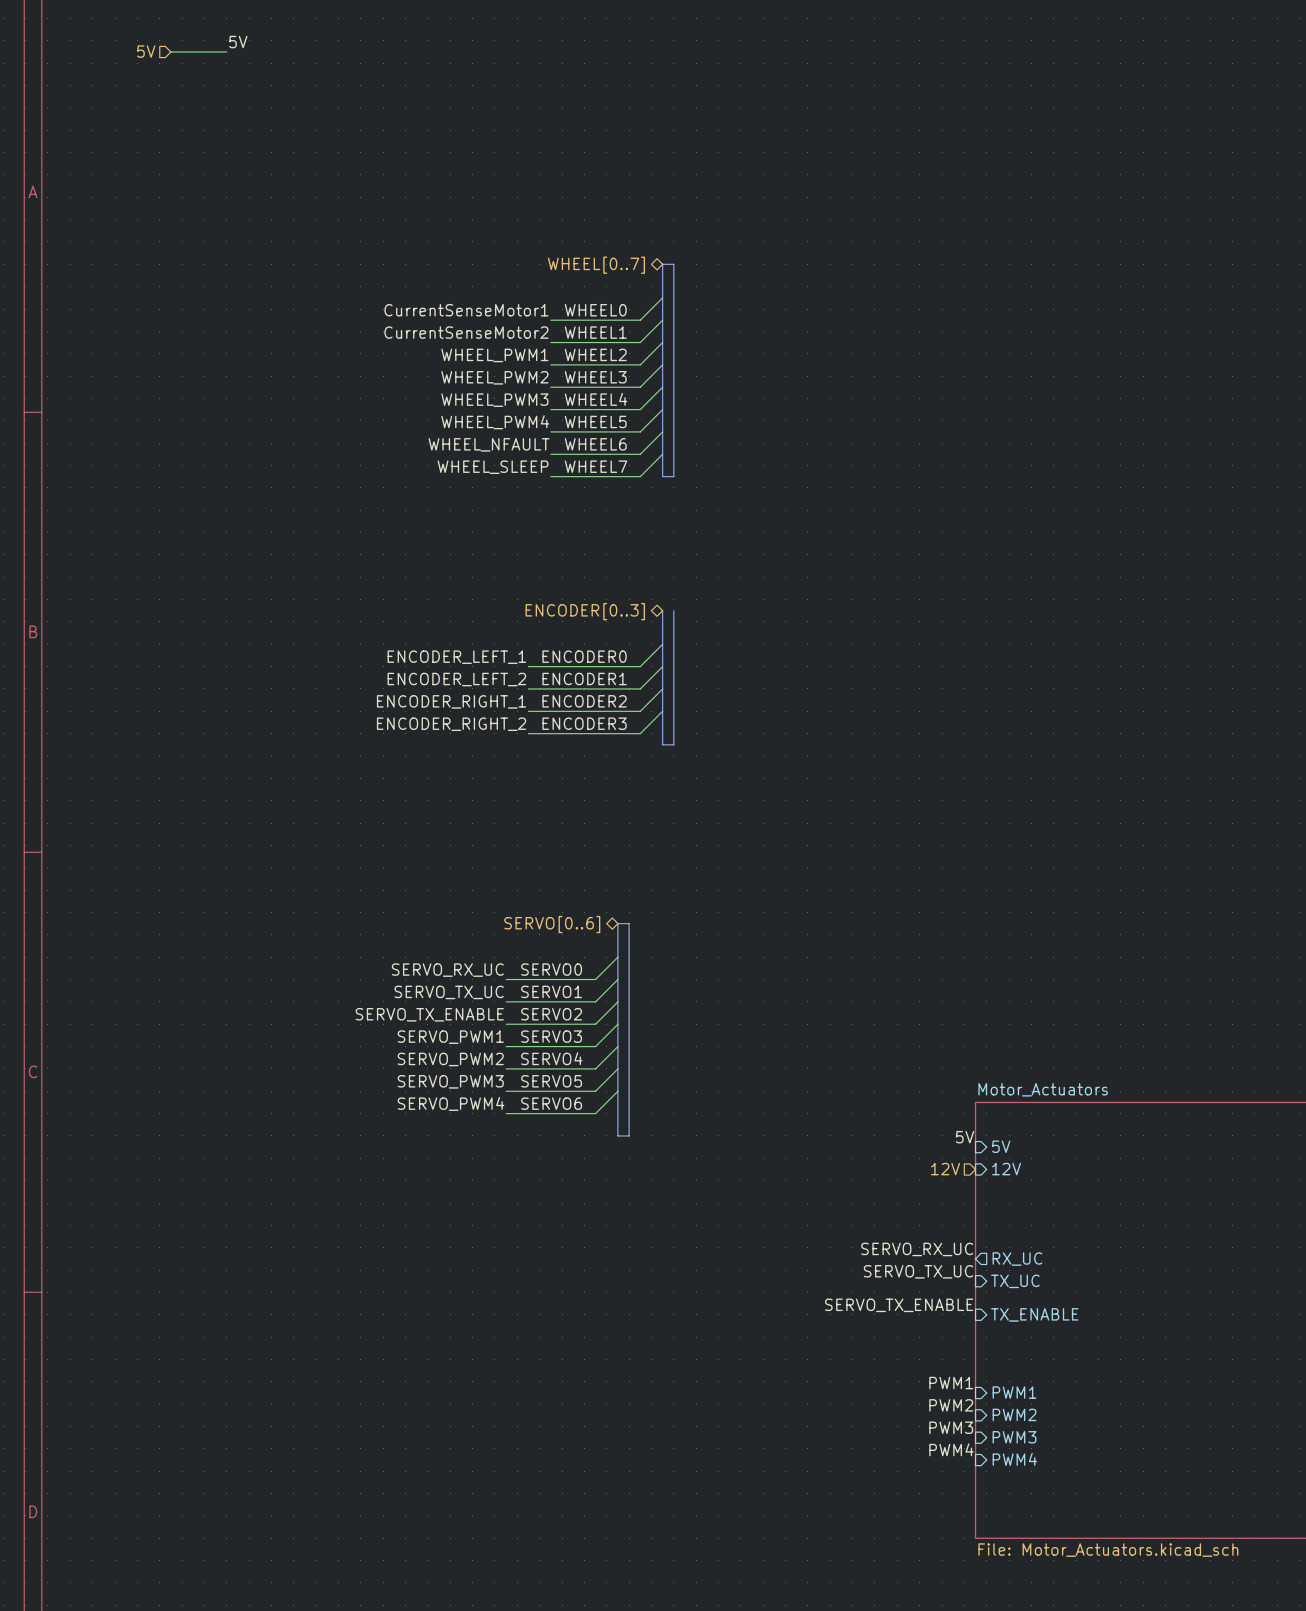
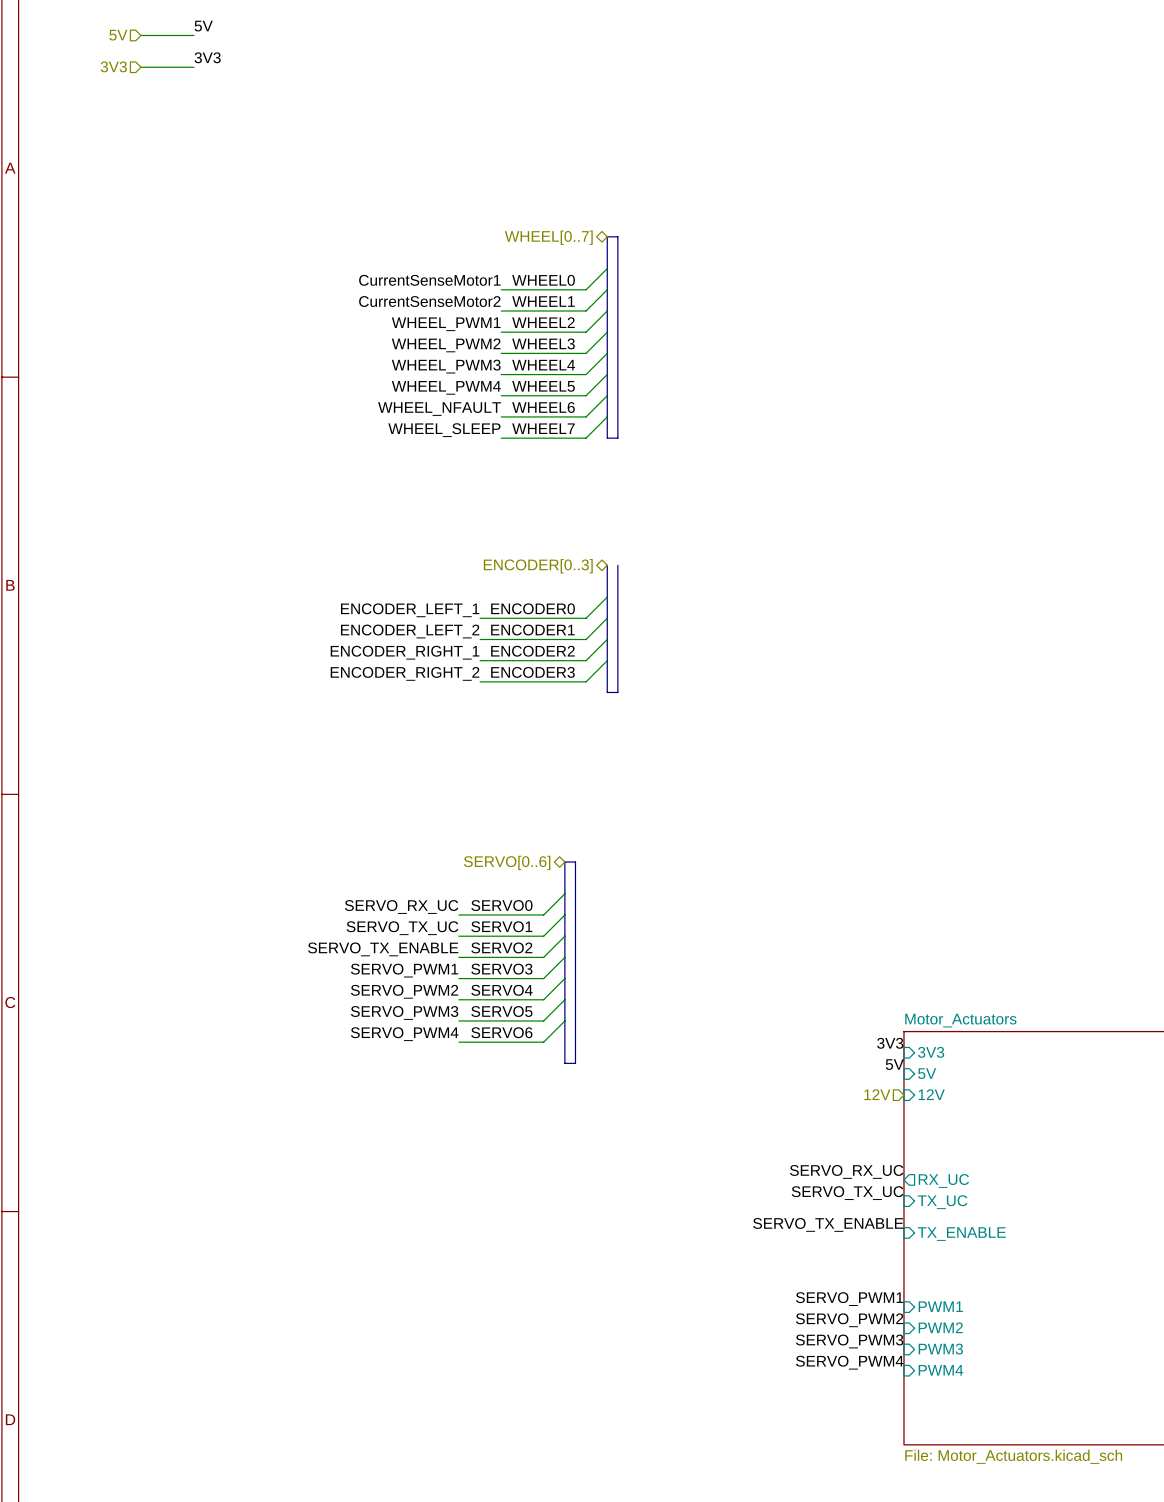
label: none -> 3V3 (207, 57)
hierarchical label: none -> 3V3 (113, 66)
wire: none -> (141, 67) (194, 67)
label: none -> 3V3 (890, 1043)
sheet pin: none -> 3V3 (931, 1052)
label: PWM1 (951, 1383) -> SERVO_PWM1 (849, 1299)
label: PWM2 (951, 1405) -> SERVO_PWM2 (849, 1320)
label: PWM3 (951, 1427) -> SERVO_PWM3 (849, 1341)
label: PWM4 (951, 1449) -> SERVO_PWM4 (849, 1362)

